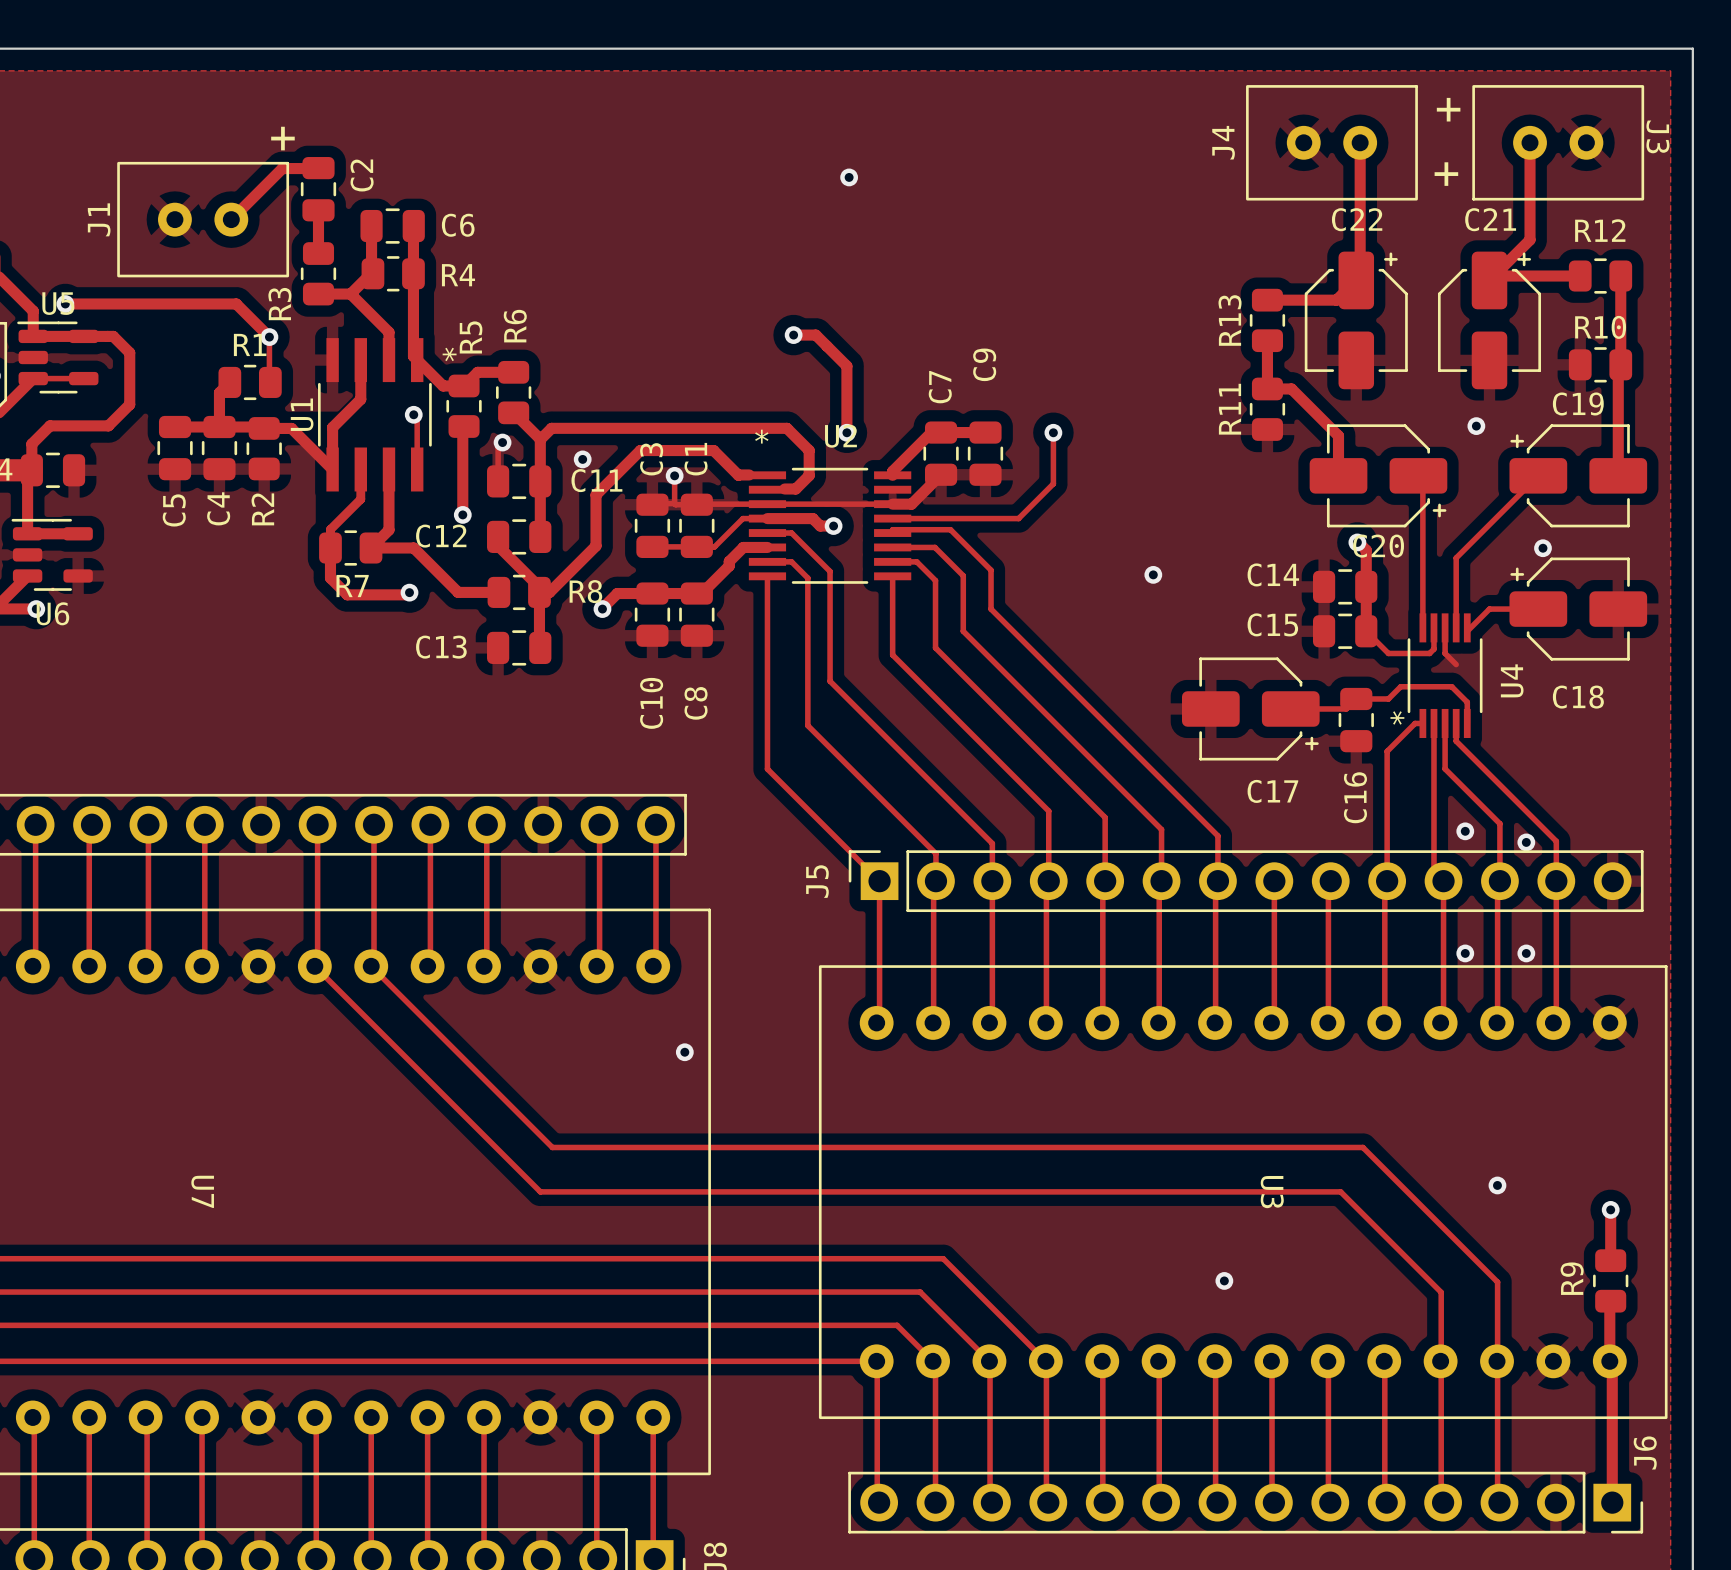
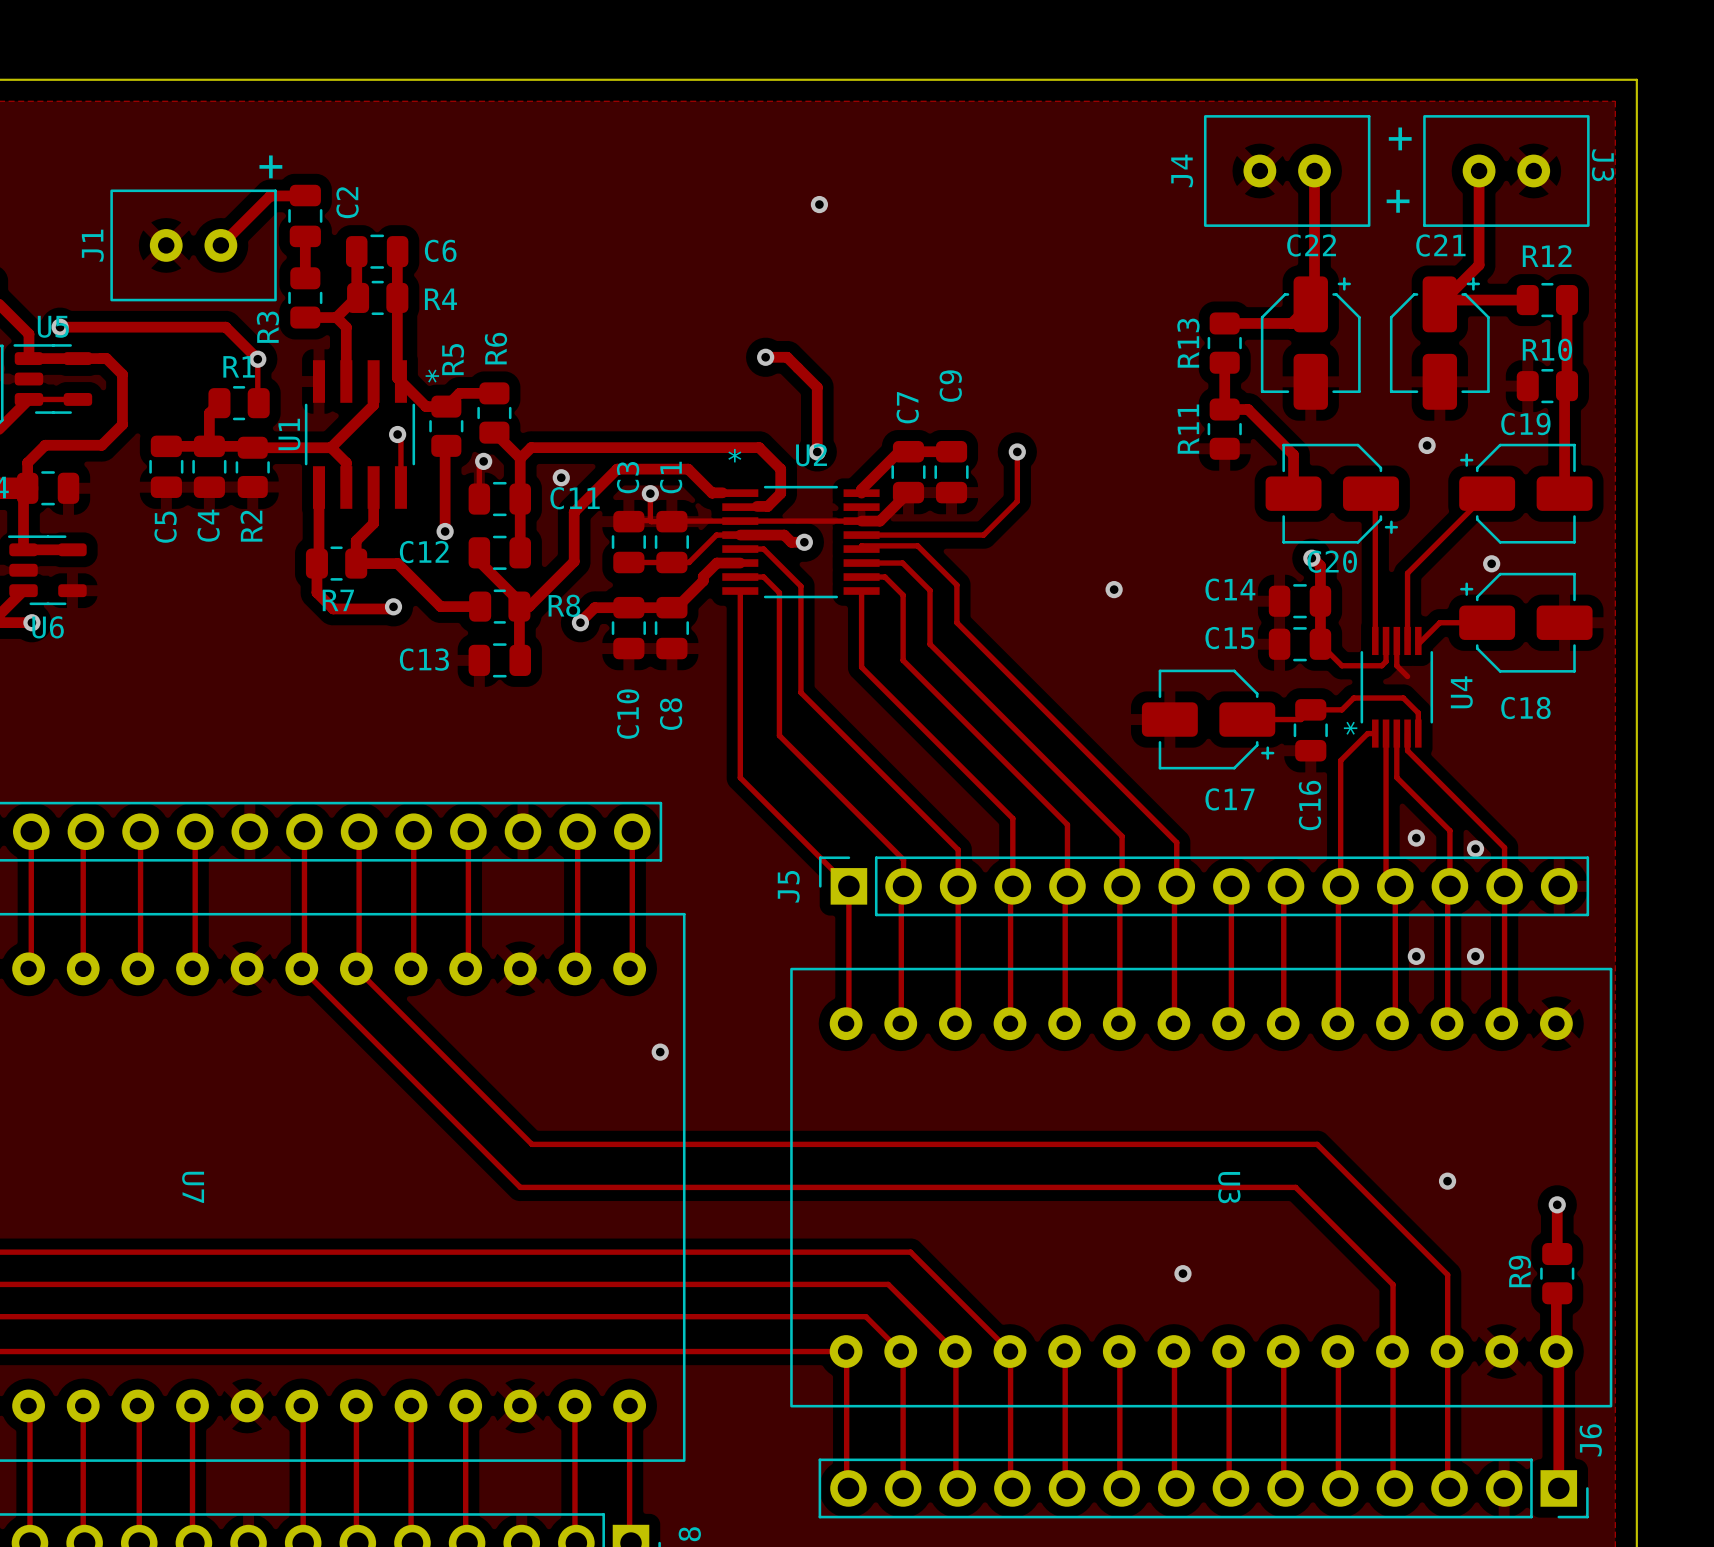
track: (360, 304) (388, 332) (388, 360) -> (346, 327) (346, 381)
track: (360, 360) (360, 399) (332, 427) (332, 469) (291, 428) -> (346, 487) (346, 462) (331, 447) (279, 447)
track: none -> (373, 381) (373, 405) (331, 447)
track: none -> (318, 487) (318, 561)
track: (360, 469) (360, 499) (330, 529) (330, 548) -> none
track: (388, 506) (388, 530) (371, 548) -> (373, 523) (356, 540) (356, 563)

